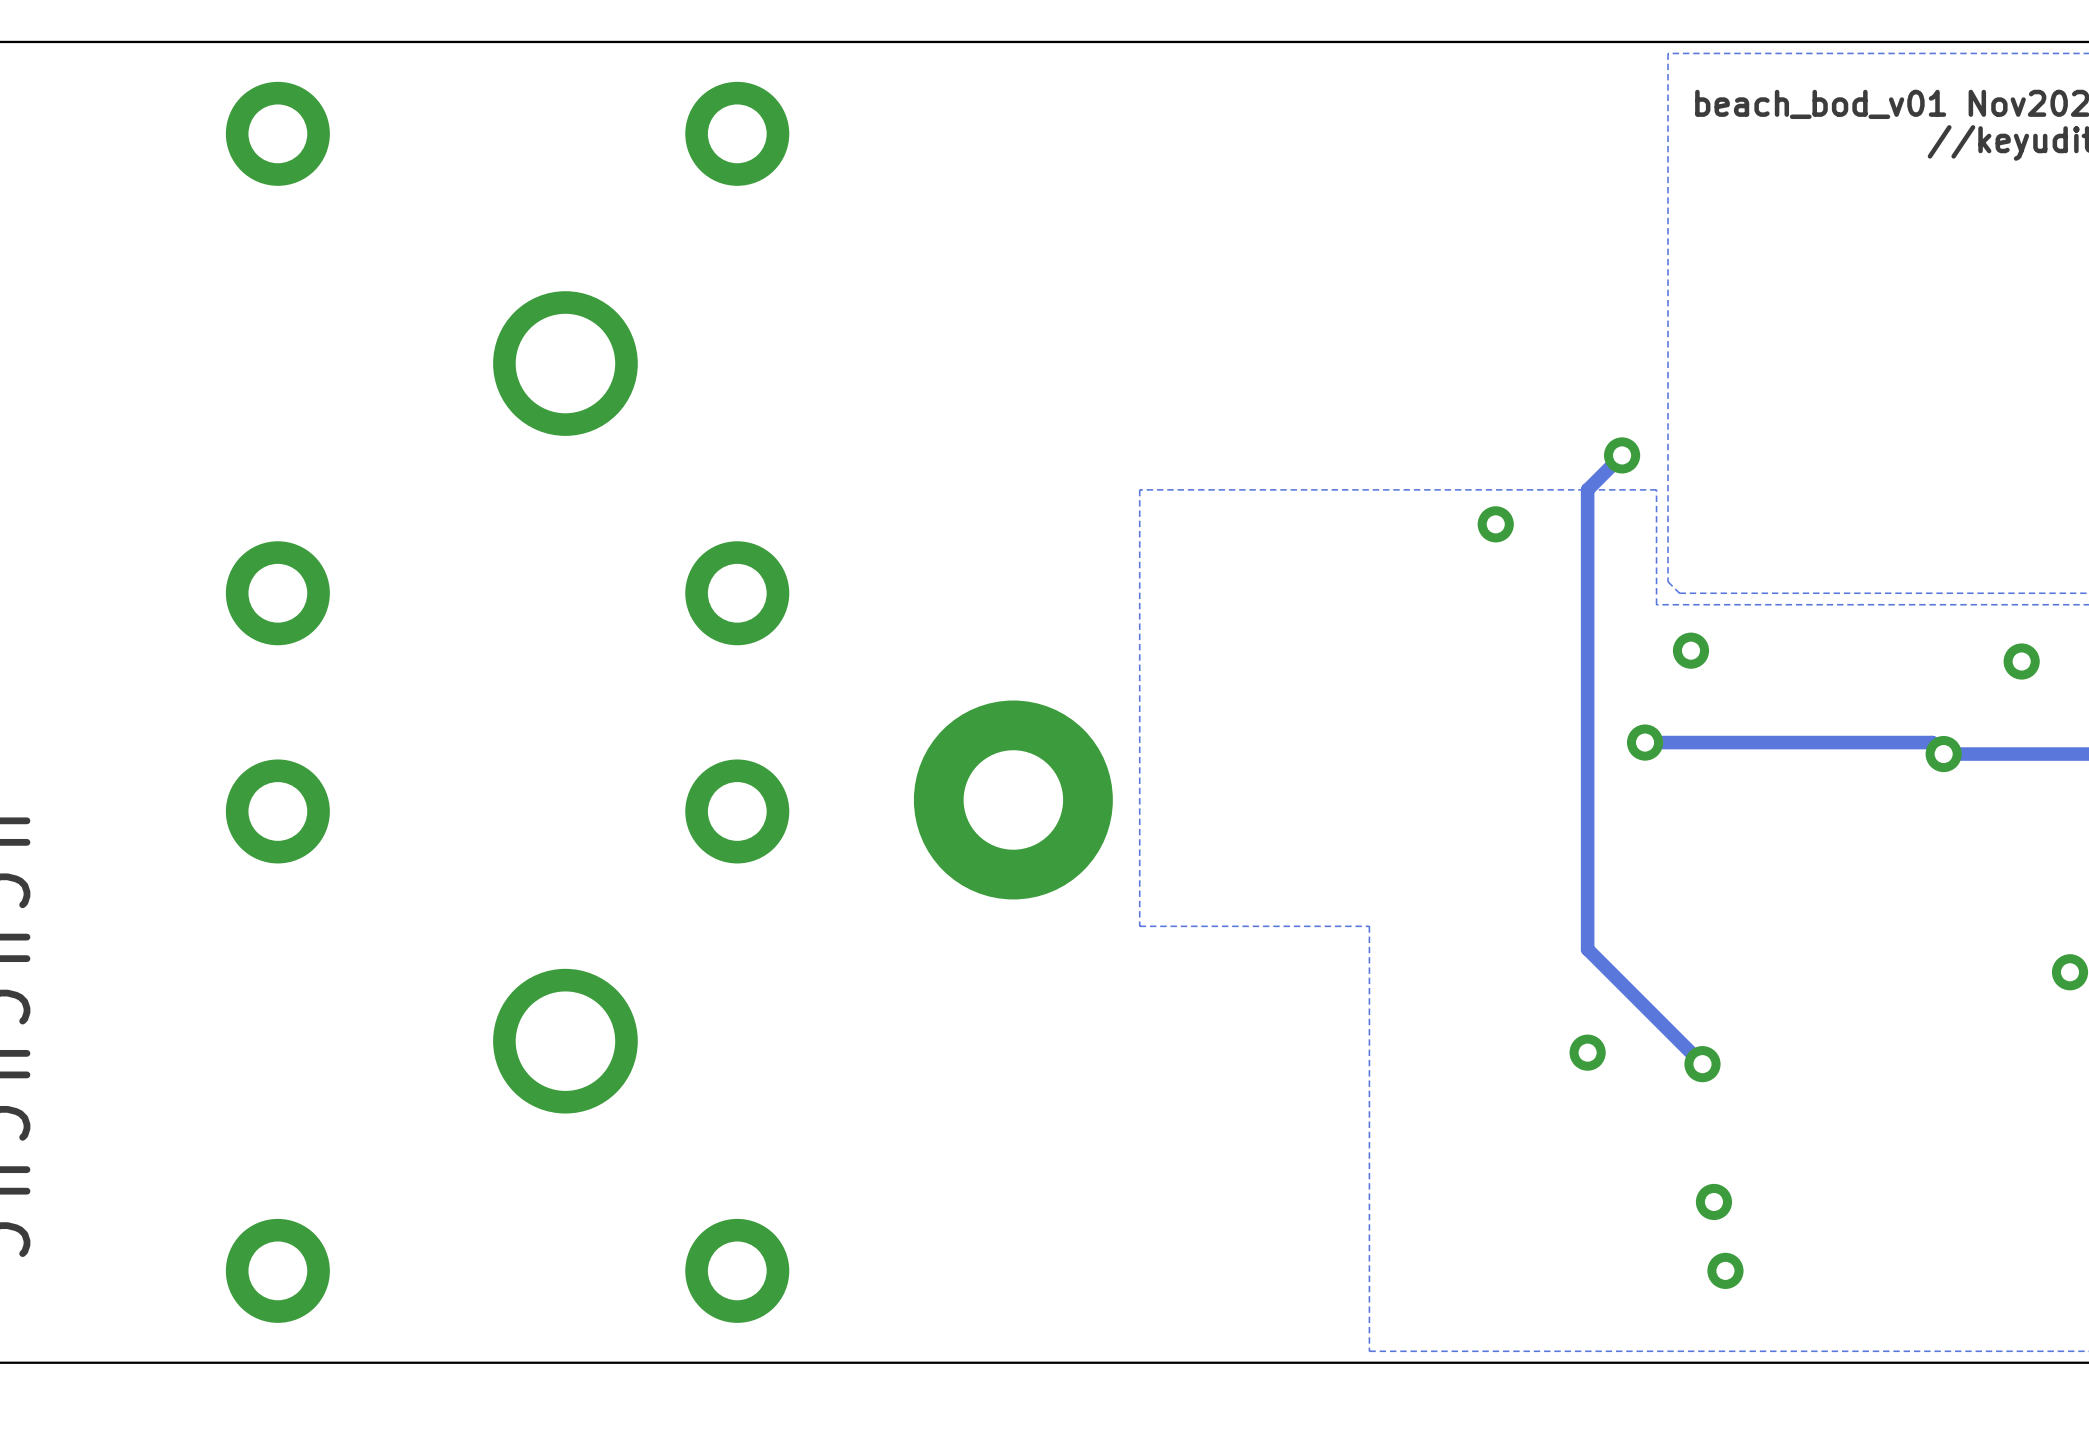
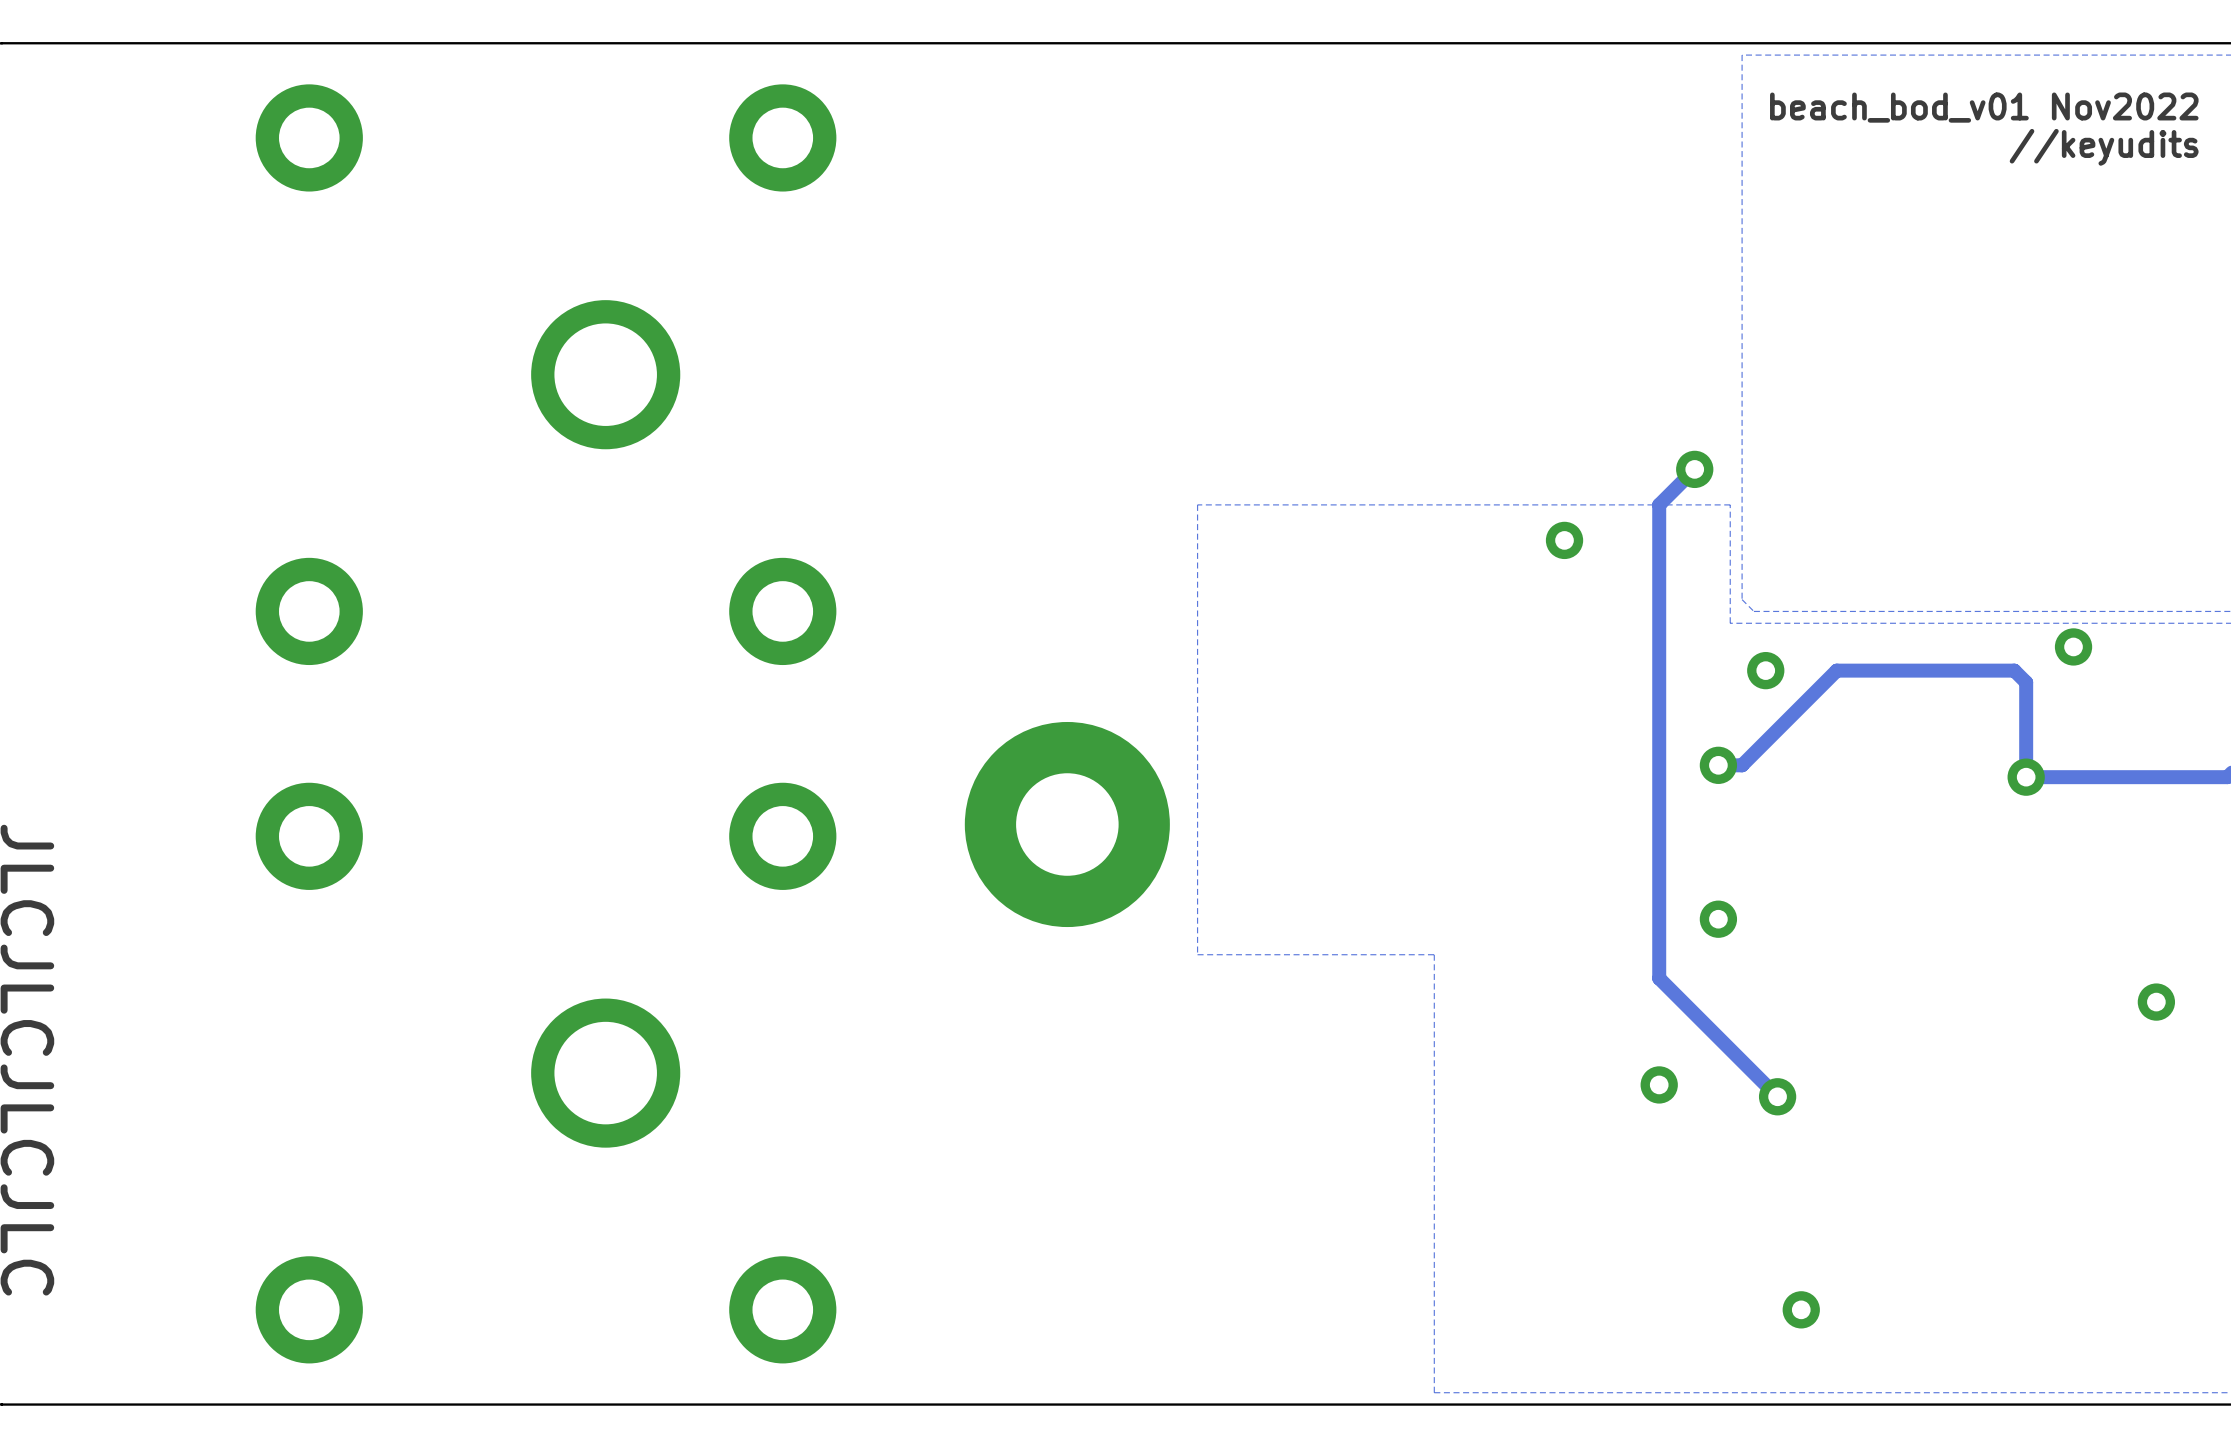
via position: (2021, 661) -> (2073, 646)
track: (1668, 742) (1932, 742) (1943, 754) -> (1742, 765) (1836, 670) (2014, 670) (2026, 682) (2026, 777)
via: none -> (1718, 919)
via: (1713, 1201) -> none

